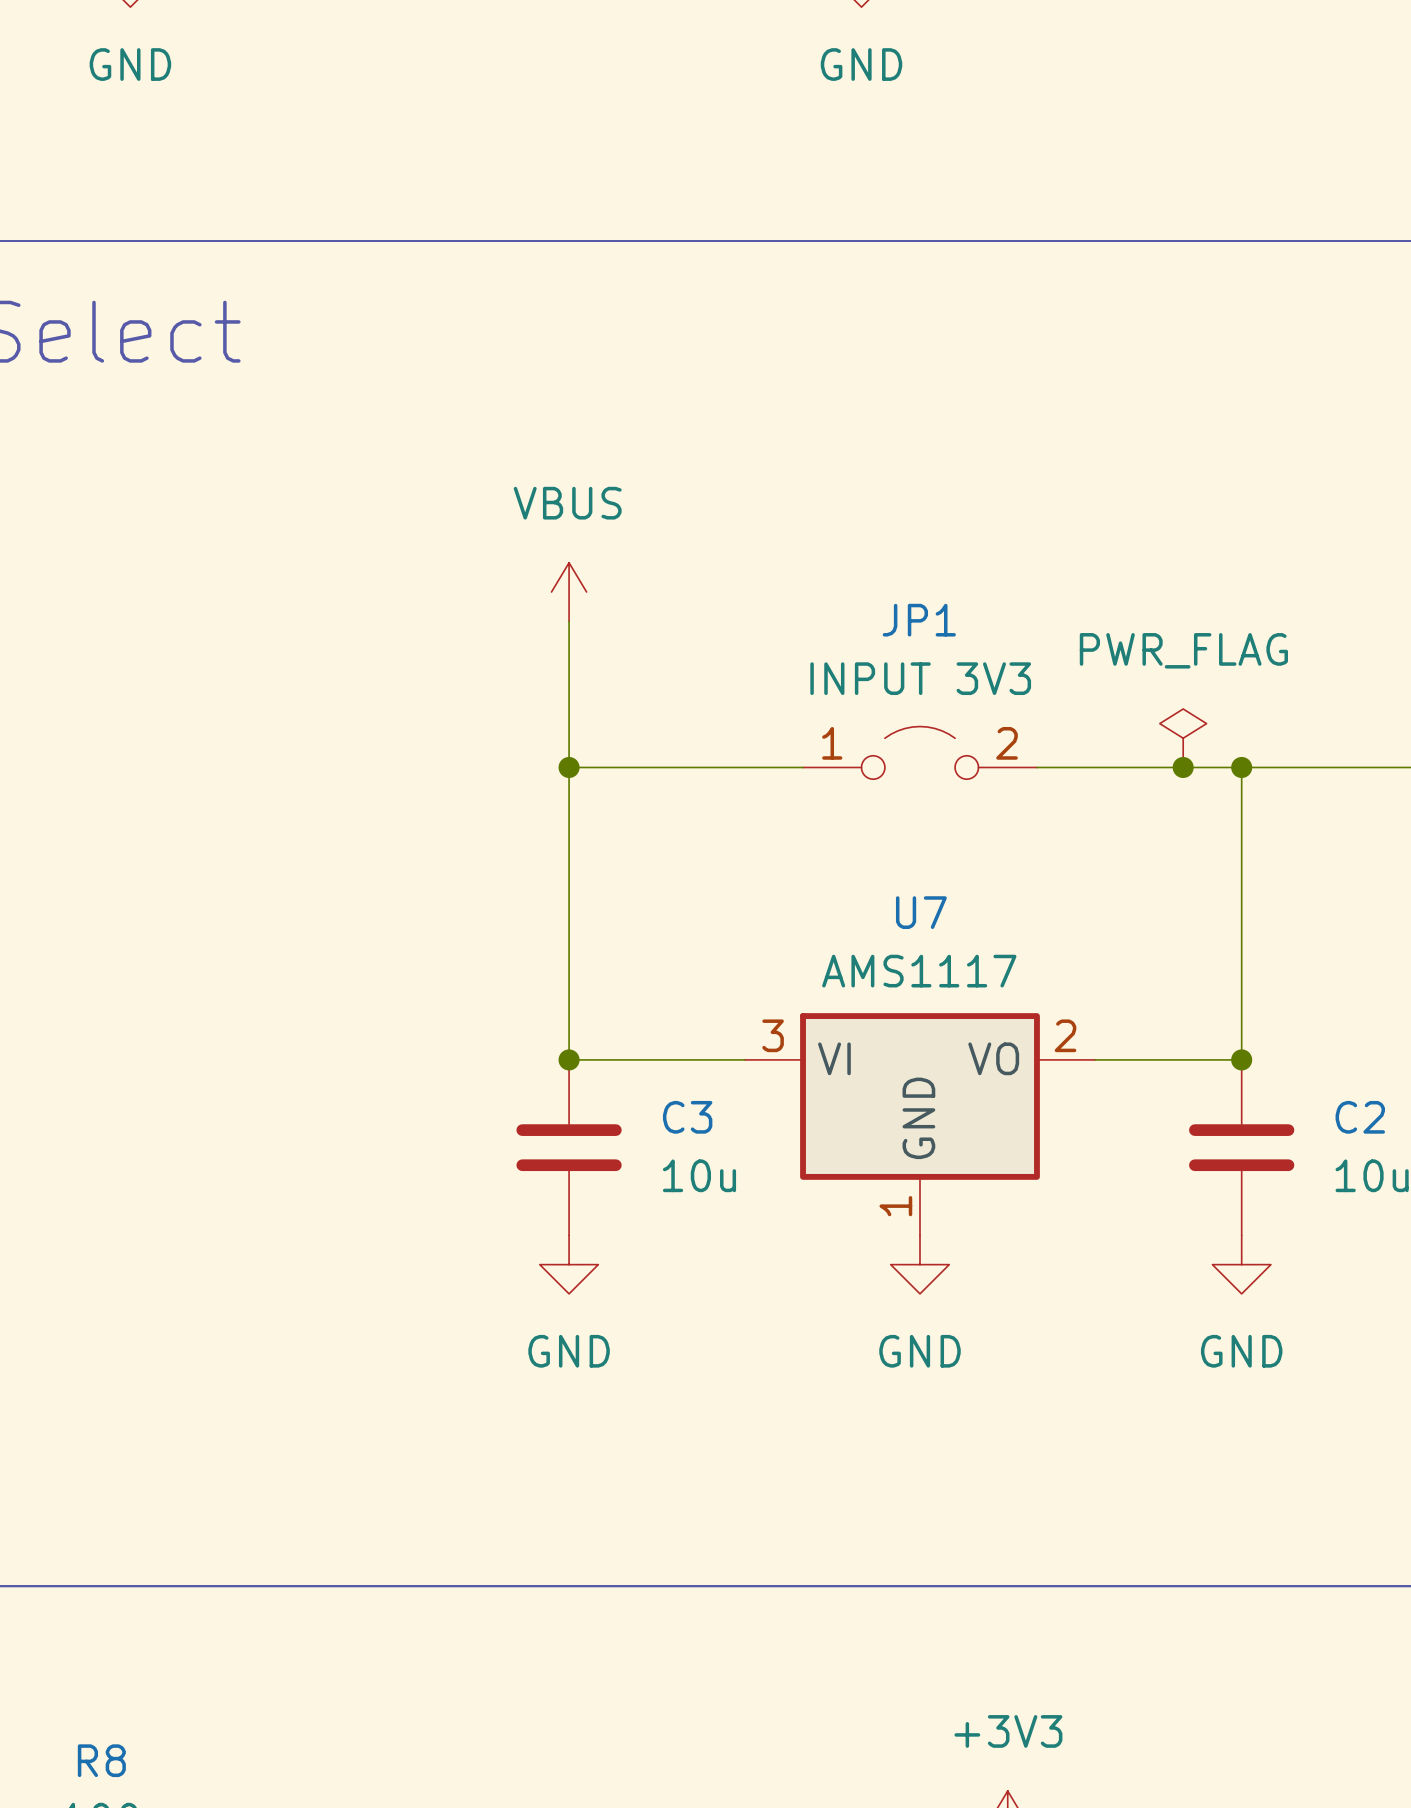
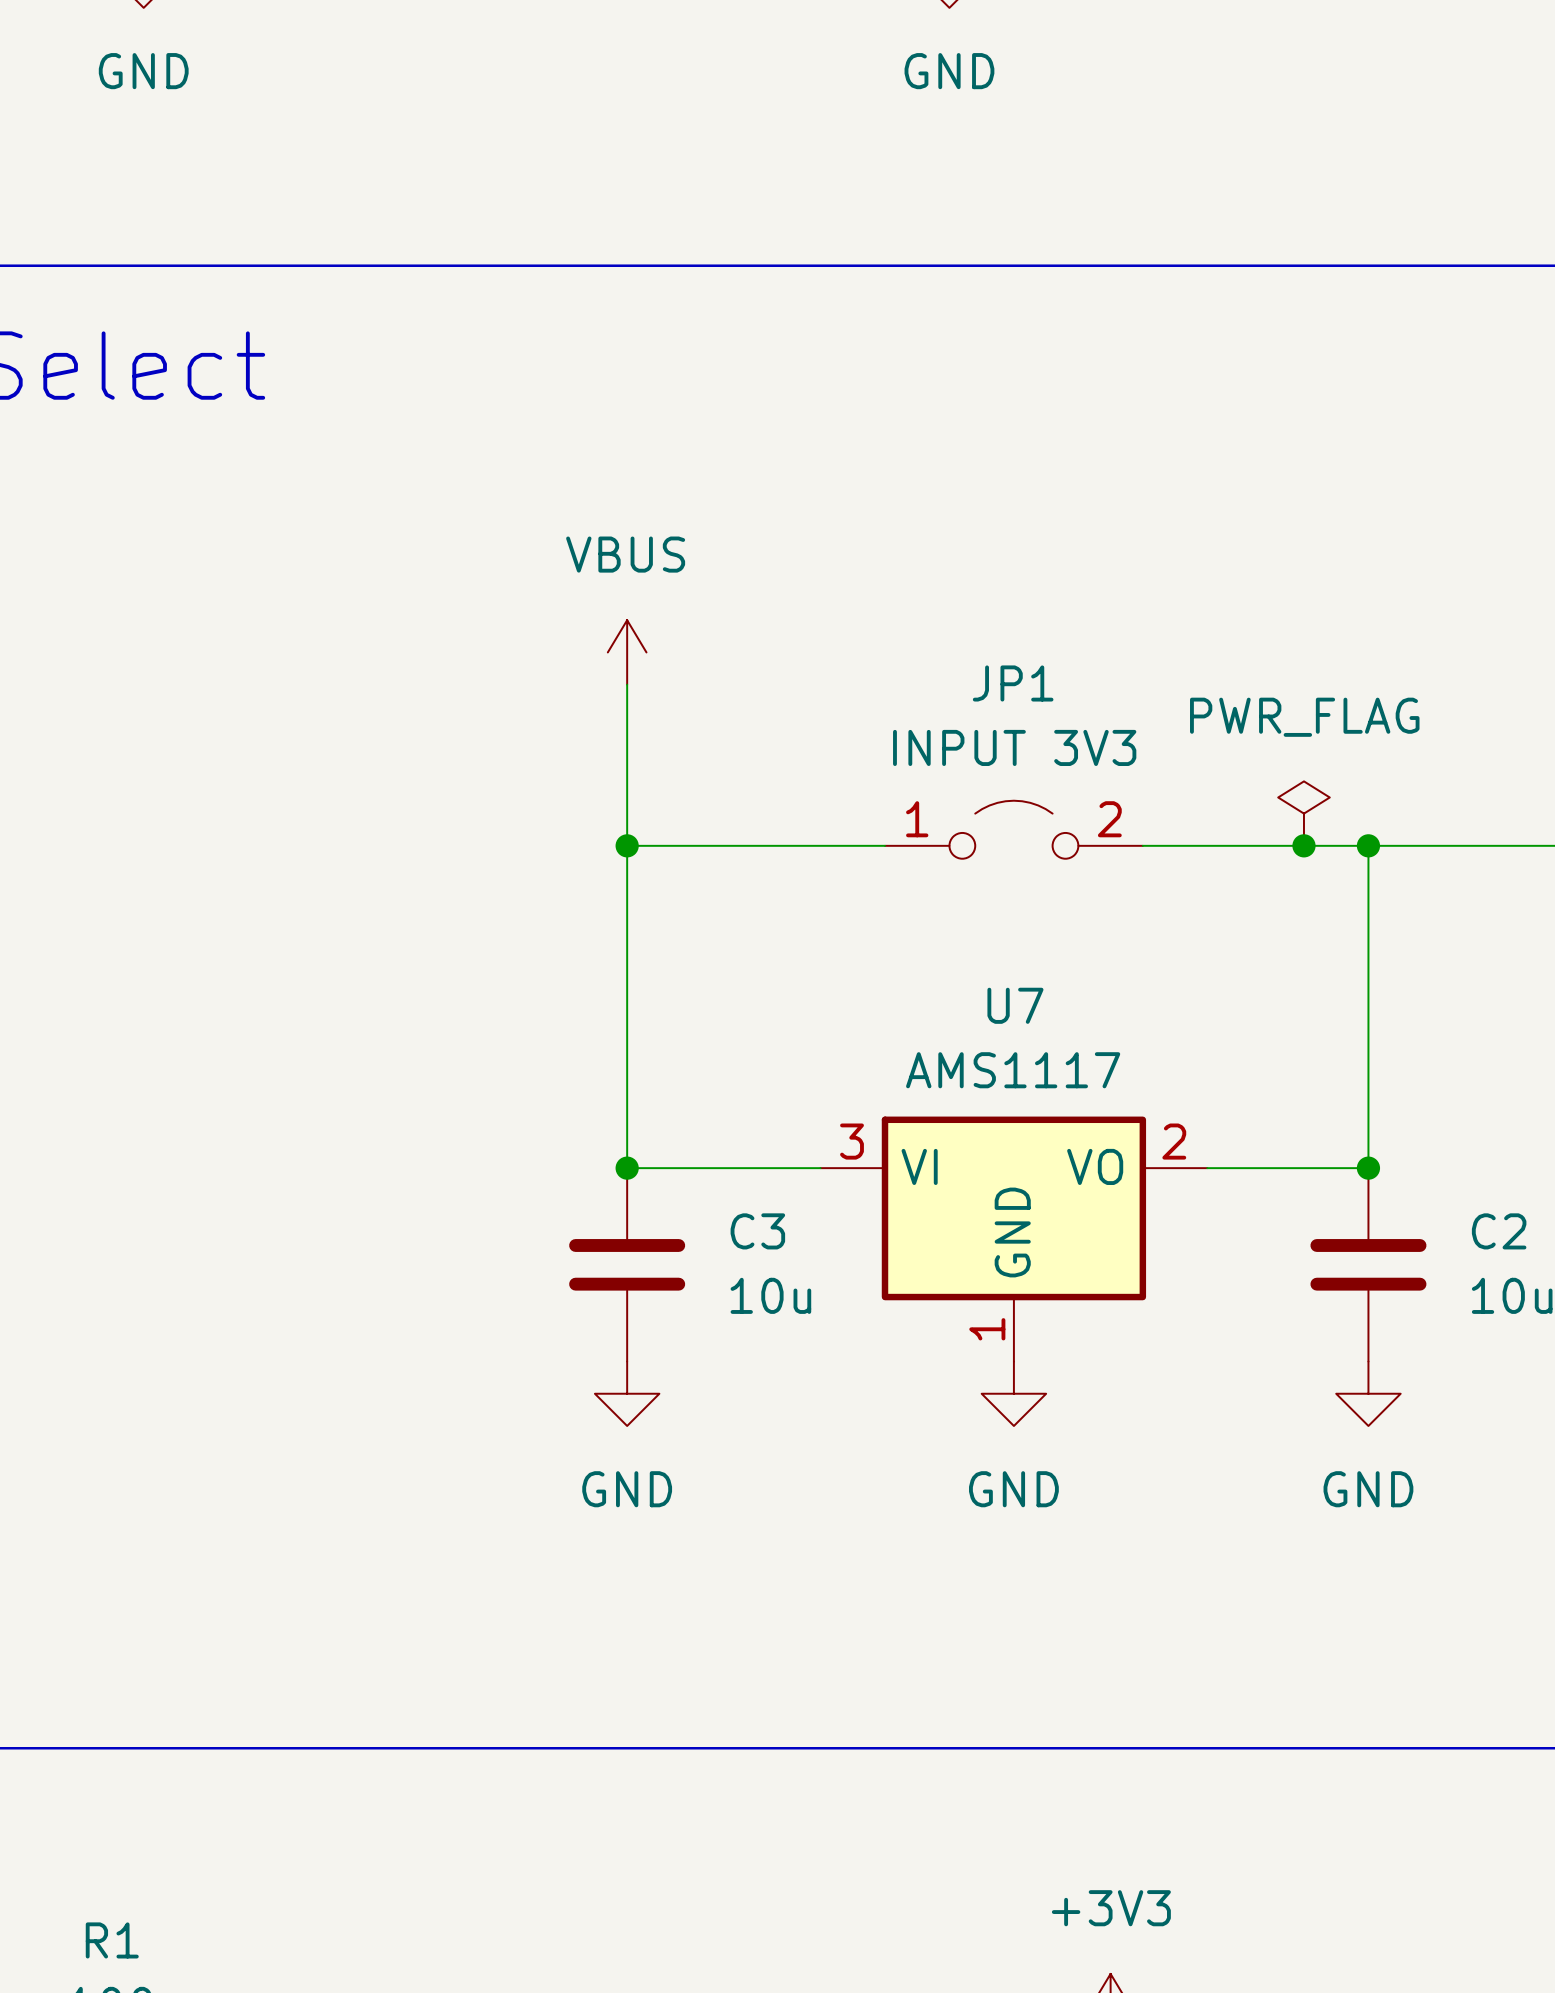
R8 name: R8 (101, 1760) -> R1 (112, 1940)

